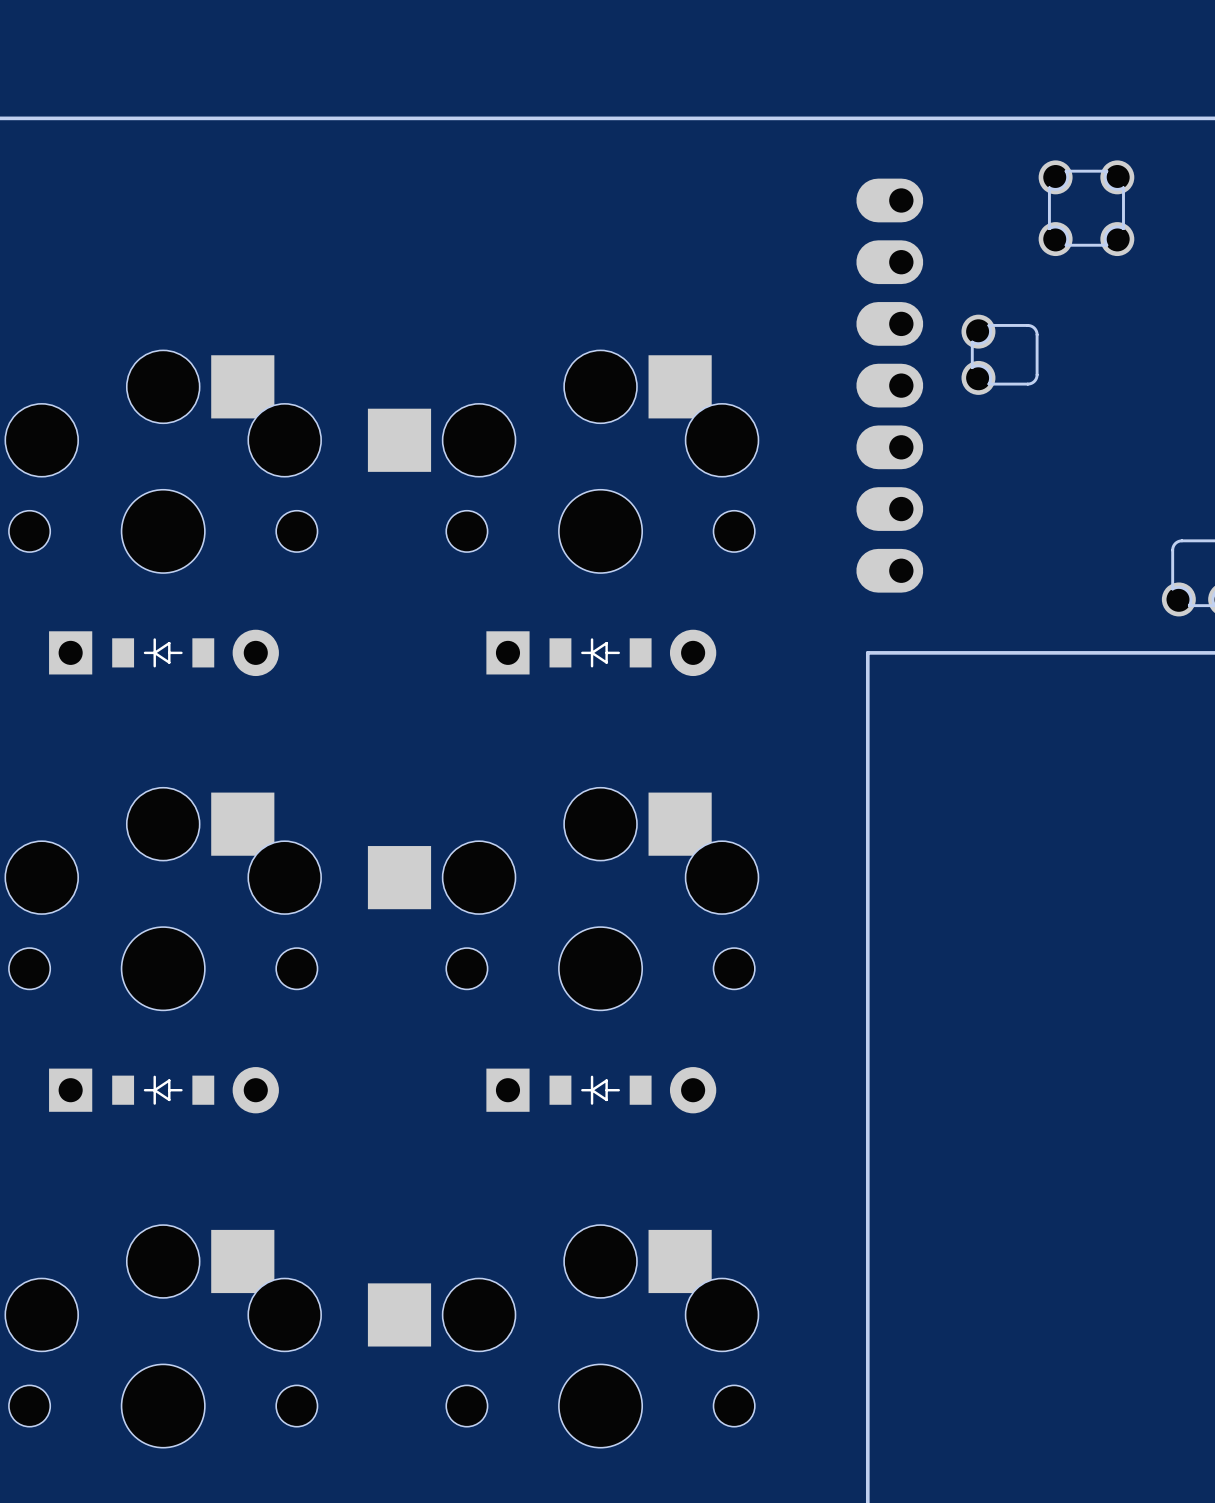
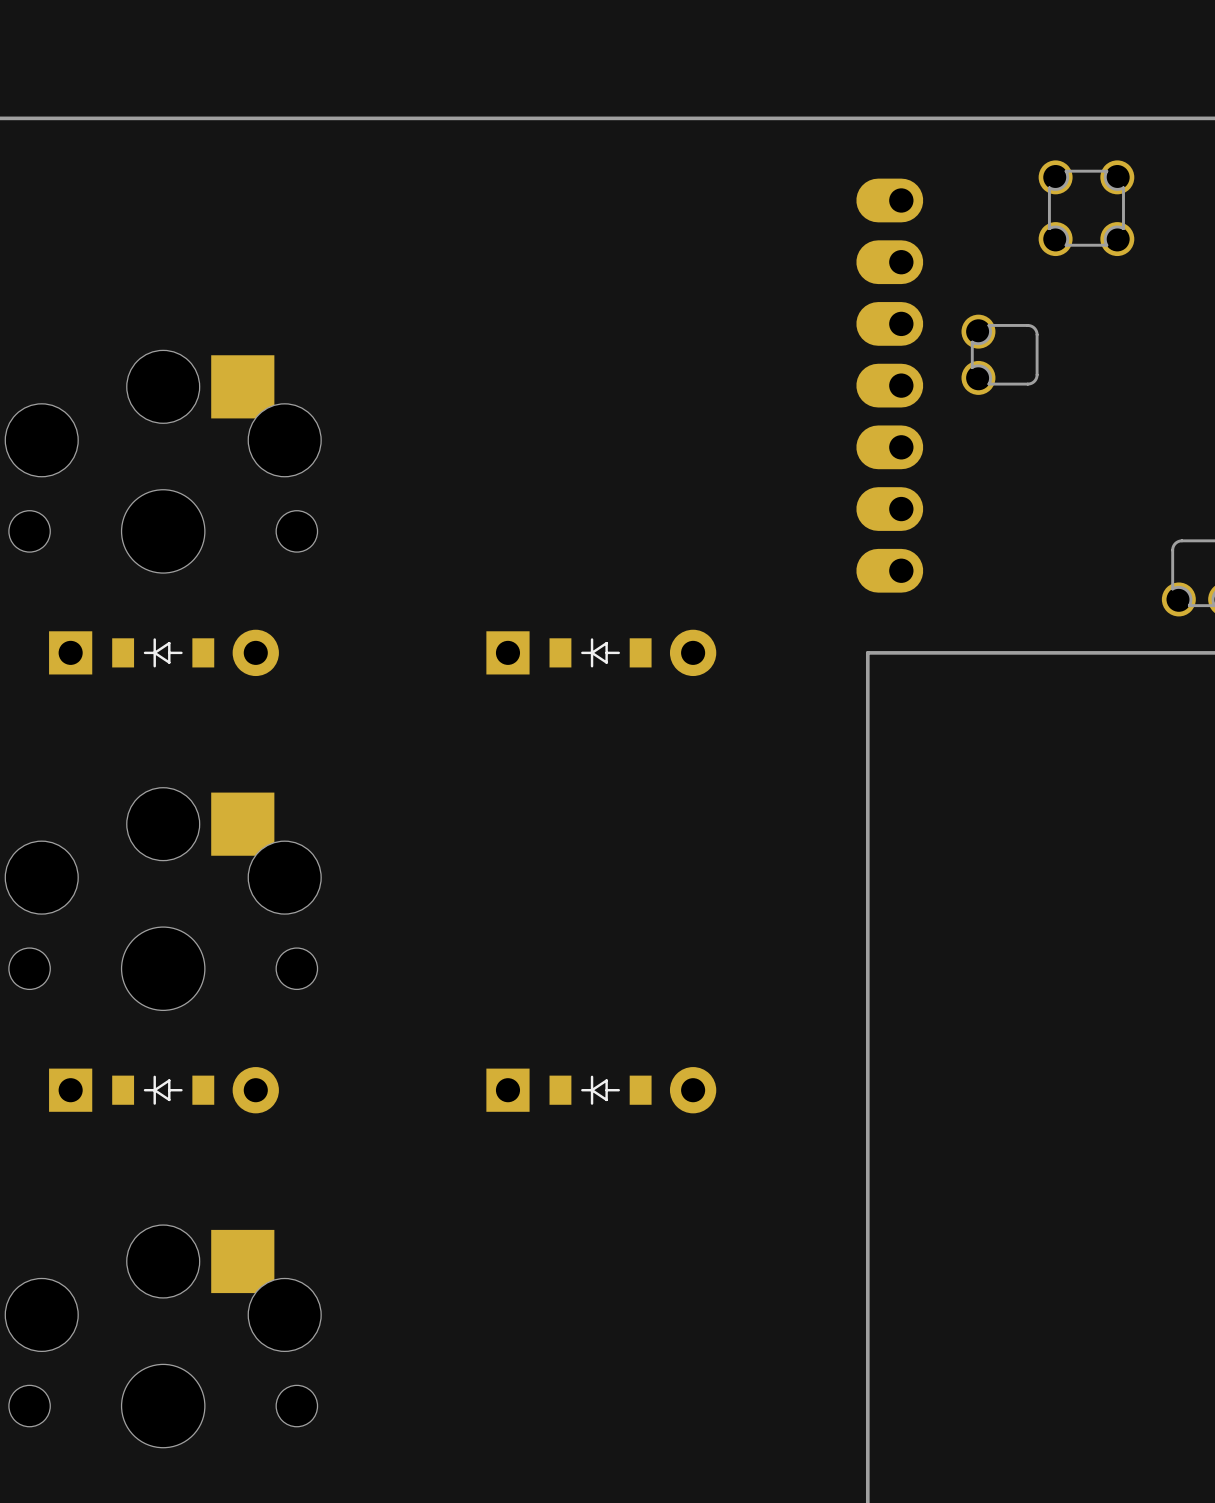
part: (563, 461) -> none
part: (563, 899) -> none
part: (563, 1336) -> none

